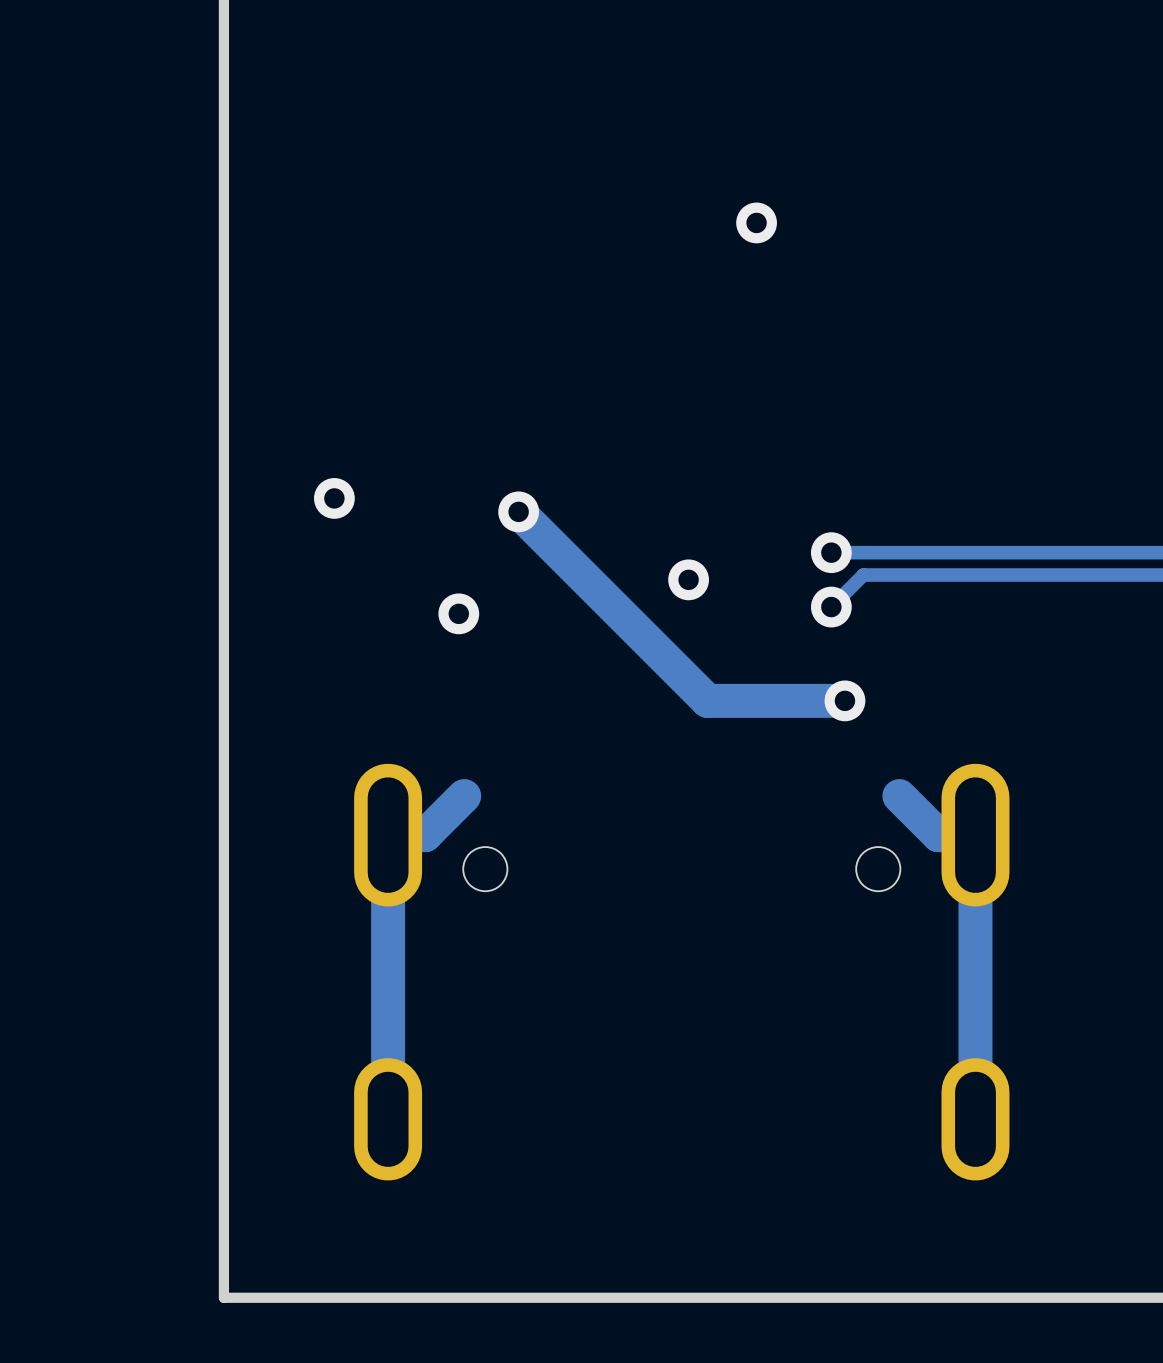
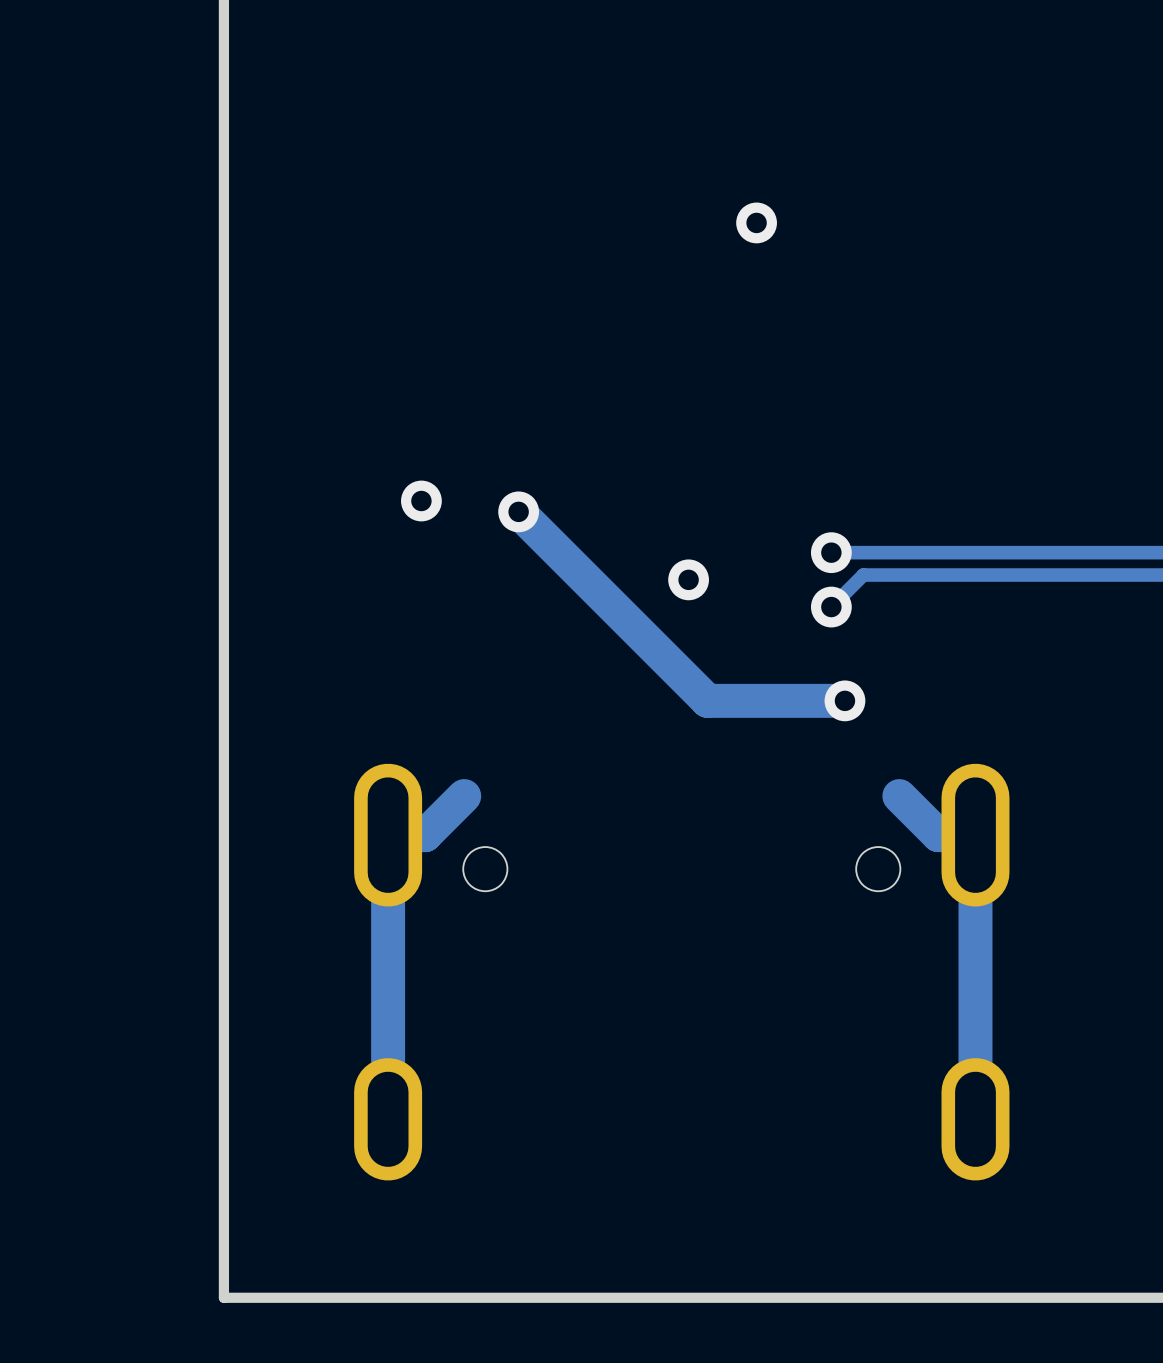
via: (334, 498) -> none
via: none -> (421, 500)
via: (458, 613) -> none

